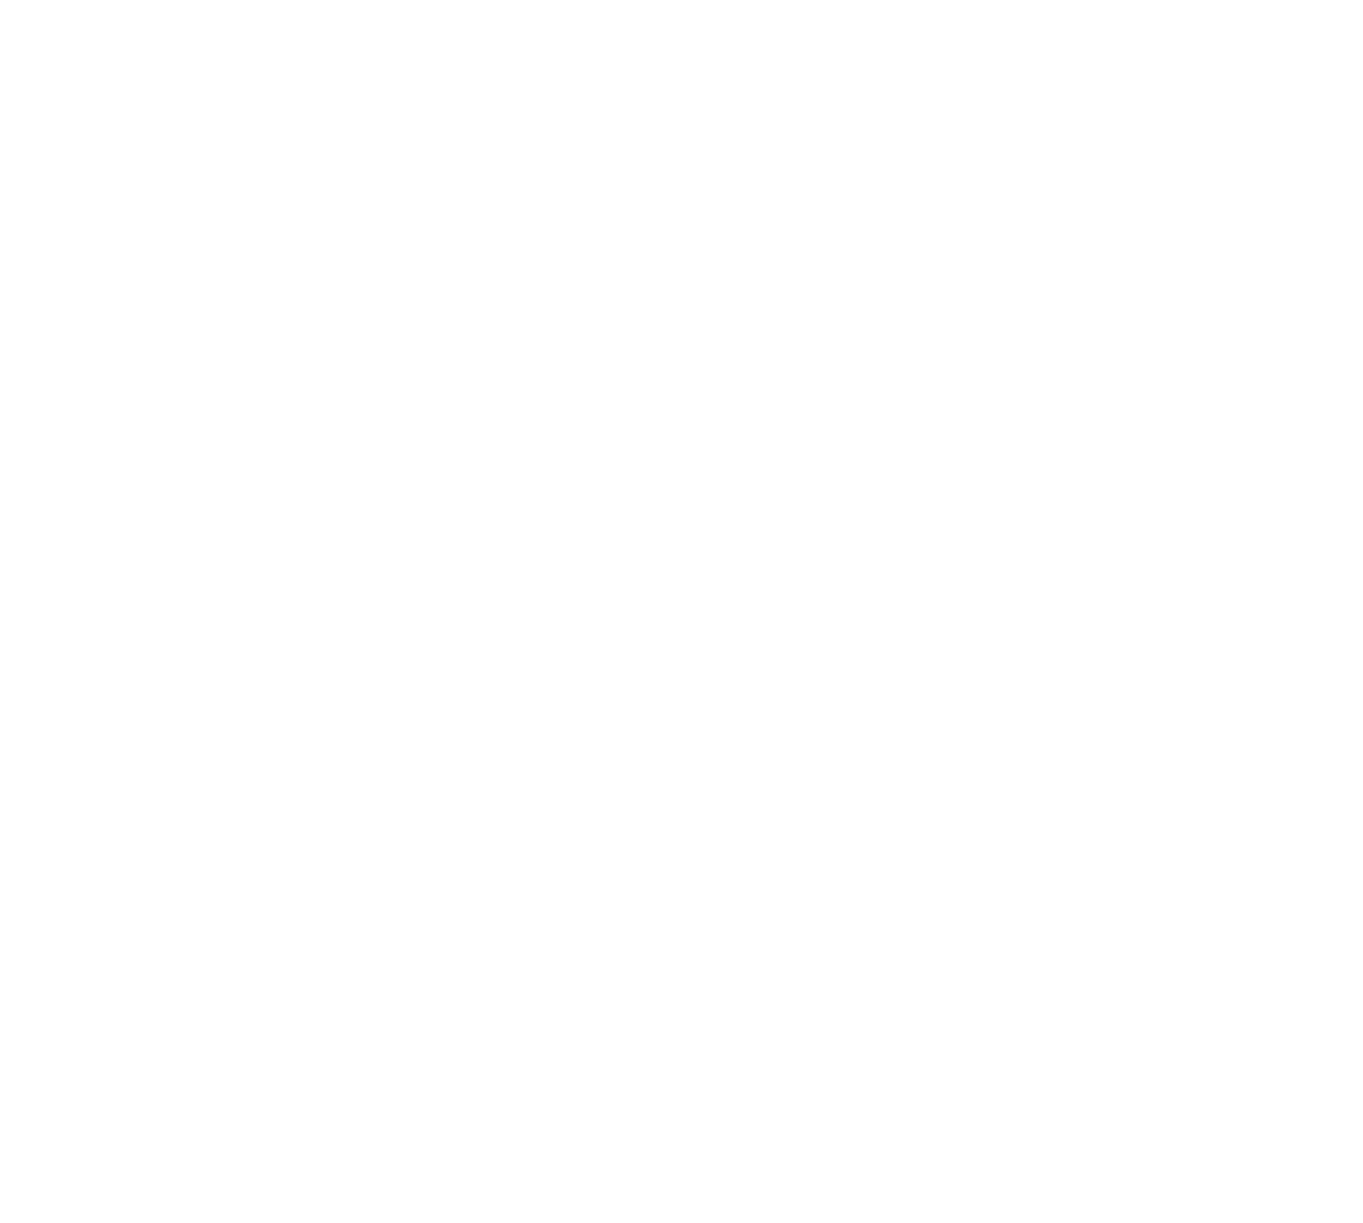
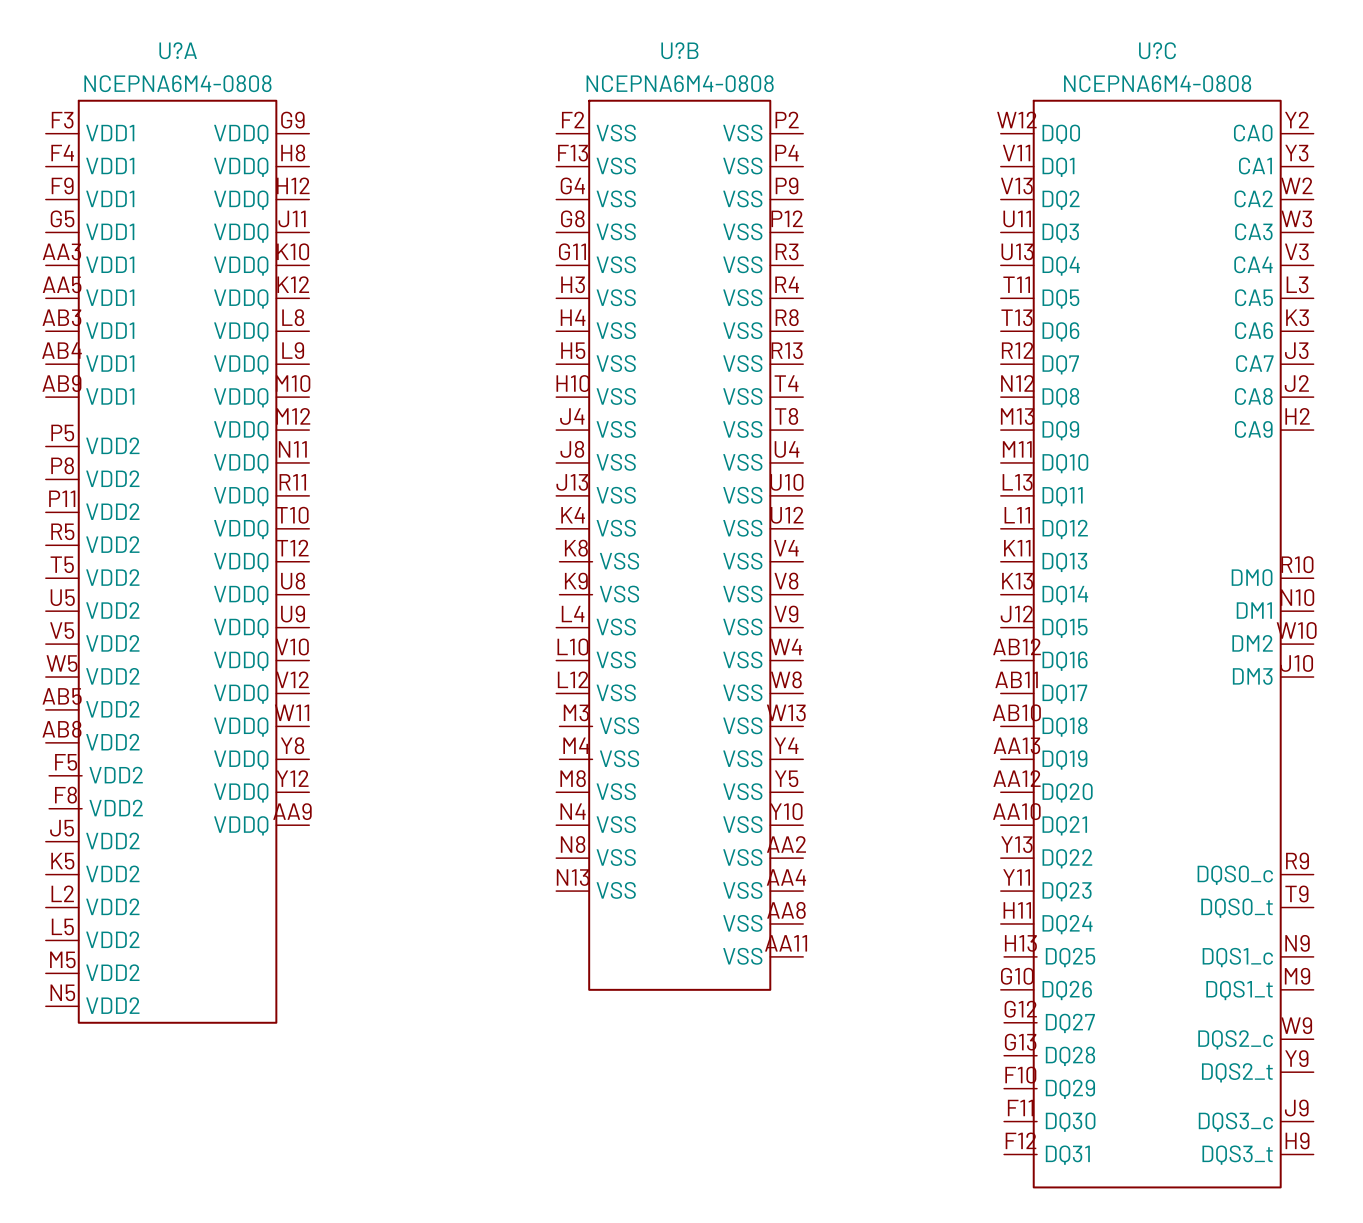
U?B: none -> NCEPNA6M4-0808 (679, 545)
U?A: none -> NCEPNA6M4-0808 (177, 561)
U?C: none -> NCEPNA6M4-0808 (1157, 644)

